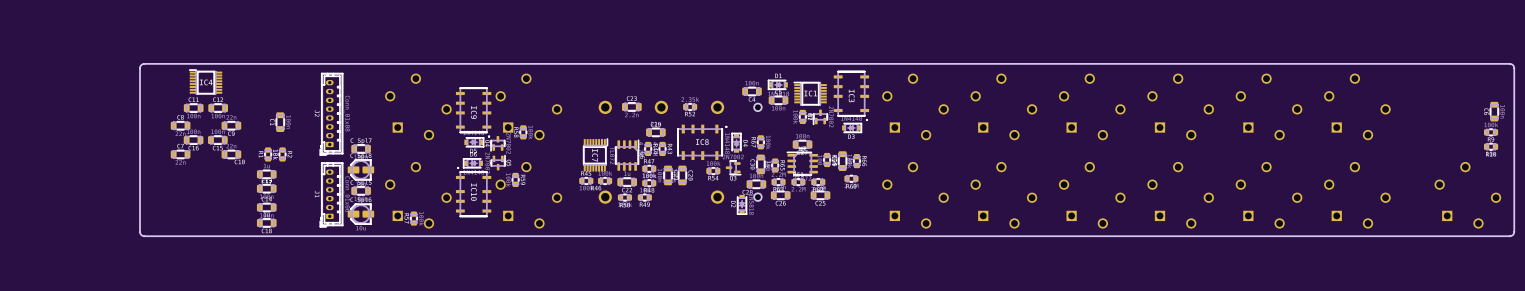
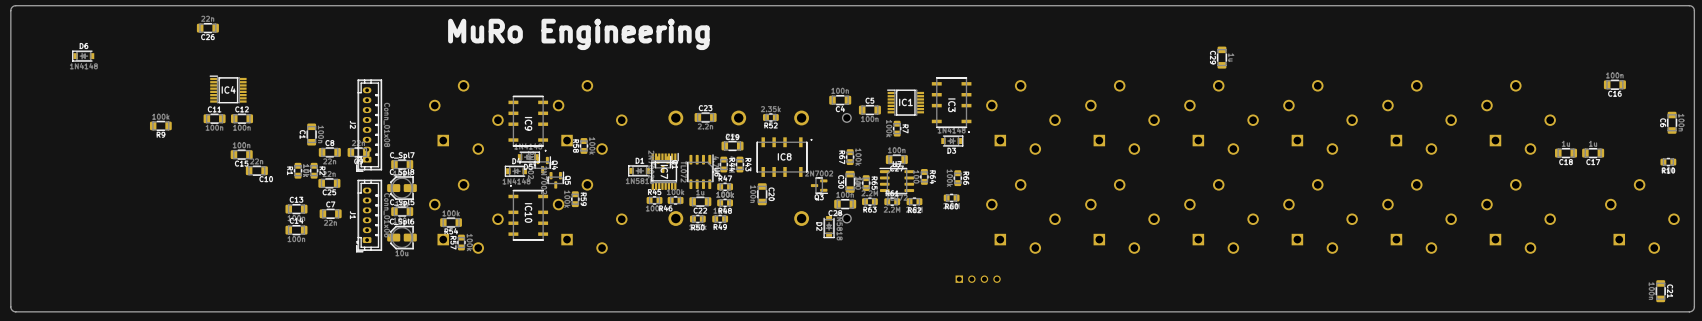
text: none -> MuRo Engineering (578, 34)
board edge: (1514, 68) (1509, 63) (144, 63) (139, 68) (139, 231) (143, 236) (1509, 236) (1514, 231) -> (1694, 74) (1694, 10) (1689, 5) (15, 5) (10, 10) (10, 306) (15, 311) (1689, 311) (1694, 307) (1694, 257)
part position: (778, 84) -> (639, 170)
part rotation: 0° (820, 117) -> 180° (662, 164)
part position: (820, 117) -> (662, 164)
part position: (180, 125) -> (329, 152)
part position: (231, 125) -> (358, 152)
part footprint: [1483, 128, 1499, 136] -> [149, 121, 172, 131]
part position: (193, 140) -> (1614, 84)
part rotation: 0° (736, 142) -> 90° counterclockwise (516, 171)
part position: (736, 142) -> (516, 171)
part rotation: 0° (497, 143) -> 180° (542, 164)
part position: (497, 143) -> (542, 164)
part position: (180, 154) -> (330, 213)
part position: (842, 161) -> (1221, 57)
part position: (473, 163) -> (83, 56)
part footprint: [706, 167, 721, 175] -> [440, 217, 462, 228]
part position: (266, 174) -> (1593, 153)
part position: (668, 175) -> (1660, 291)
part position: (780, 195) -> (207, 28)
part position: (820, 195) -> (329, 183)
part position: (266, 222) -> (1566, 153)
part: none -> (978, 279)

